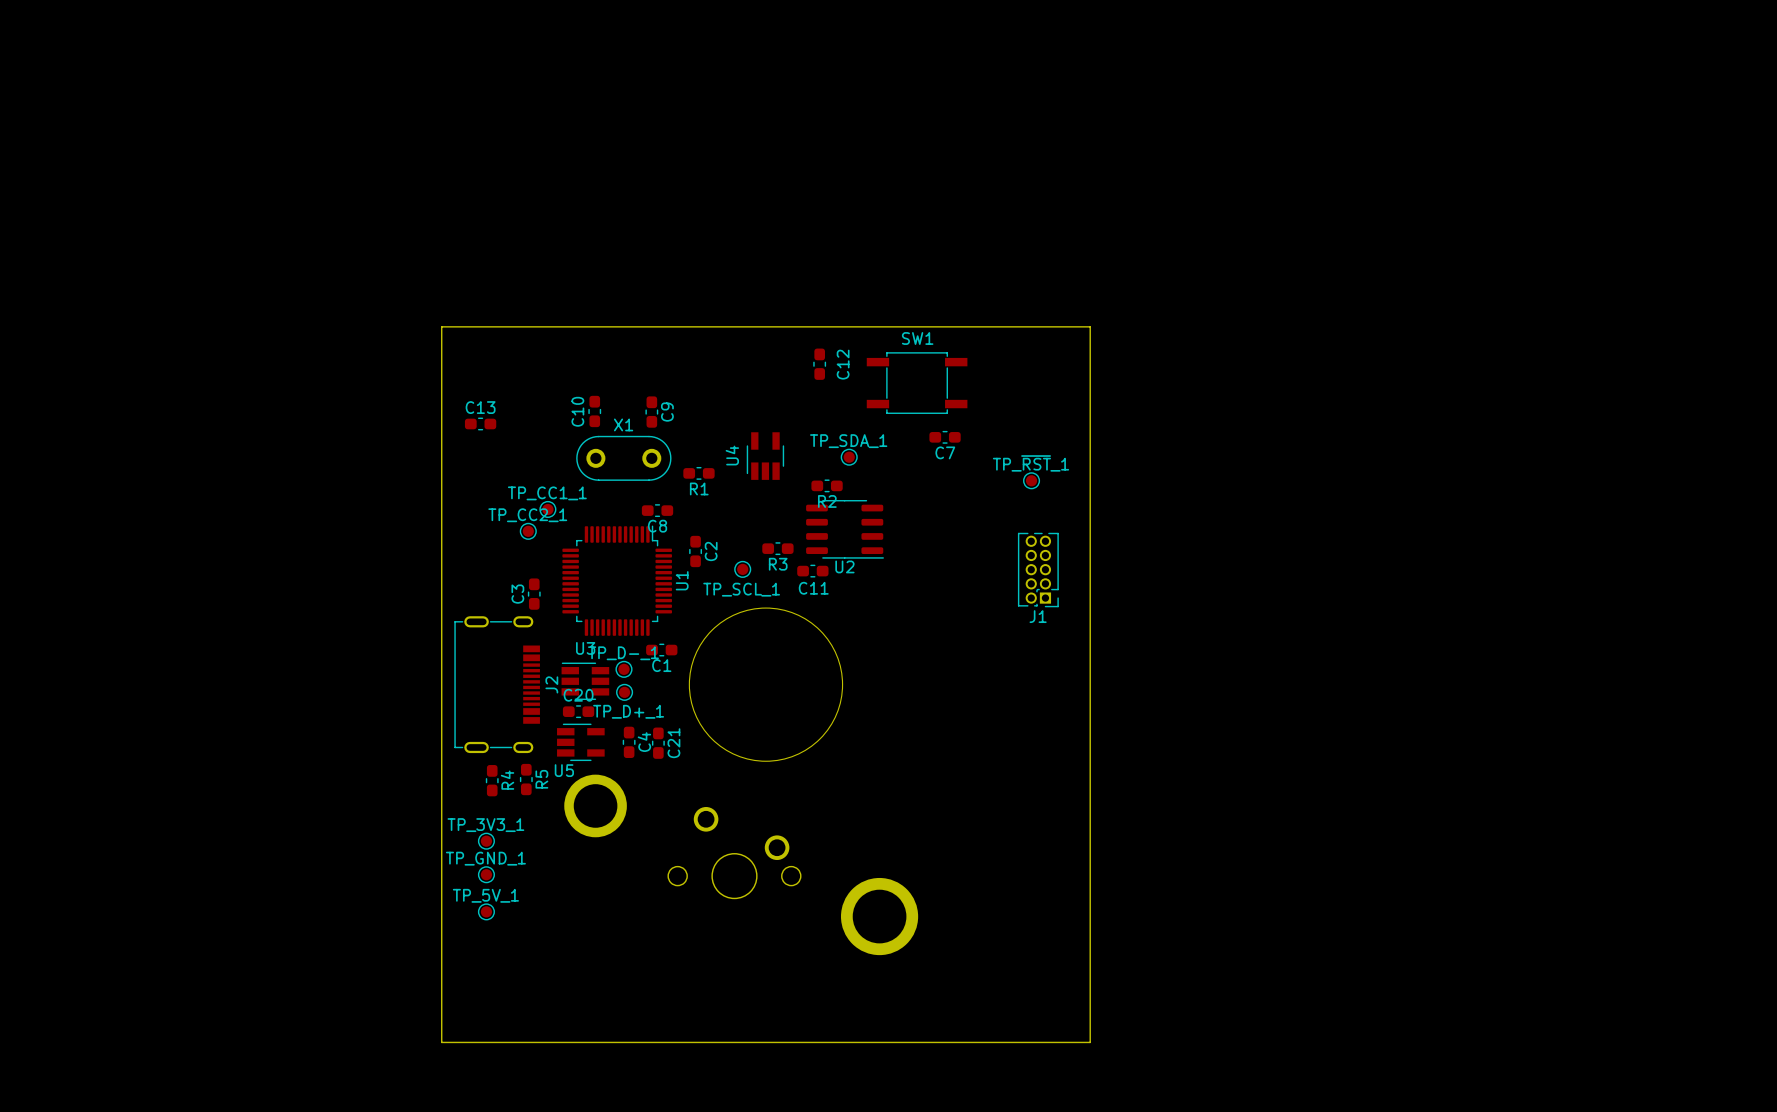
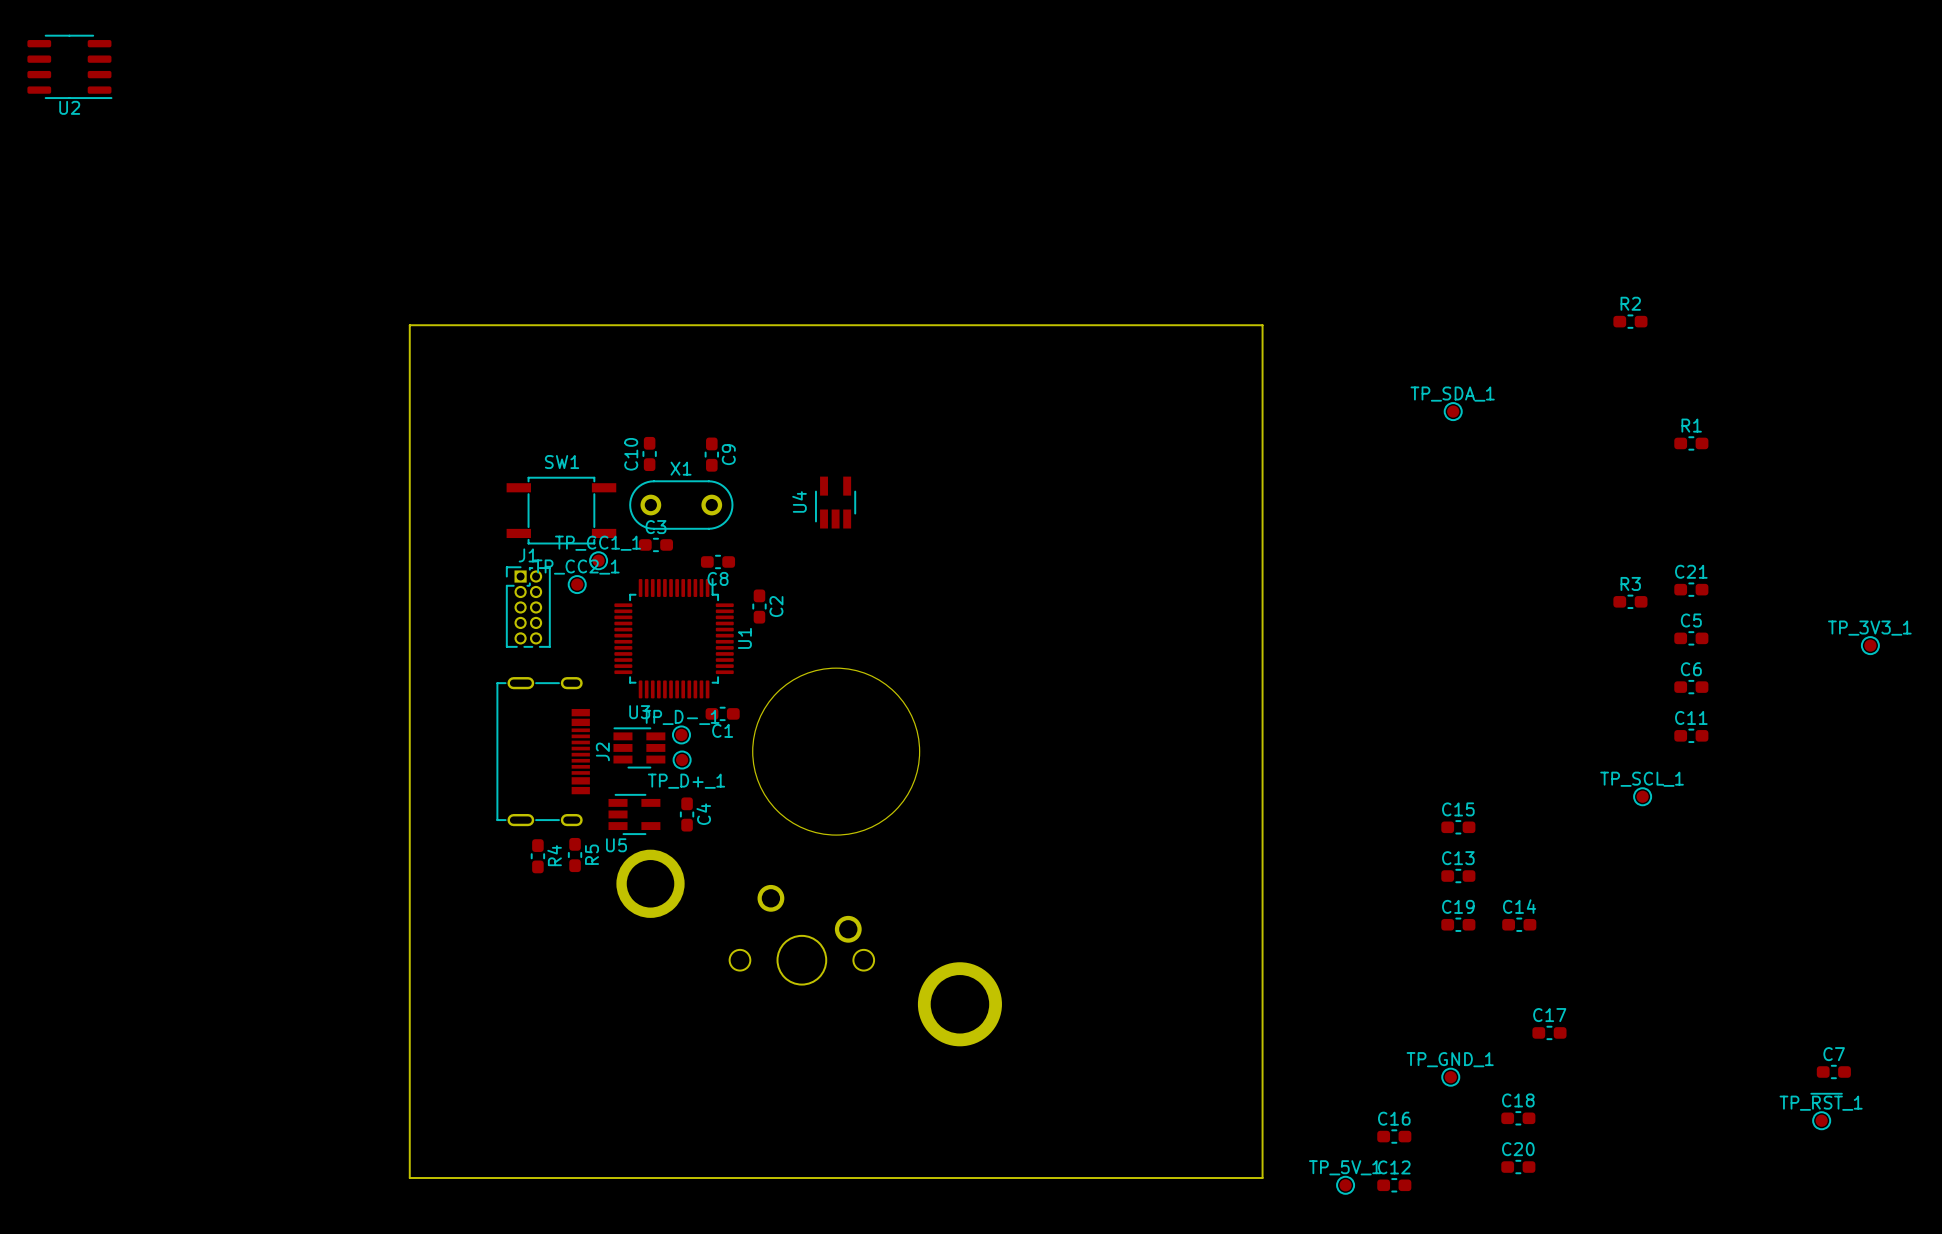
board edge: (441, 326) (1090, 326) (1090, 1042) (441, 1042) (441, 326) -> (409, 325) (409, 1178) (1262, 1178) (1262, 325) (409, 325)
C12 rotation: 0° (819, 364) -> 90° clockwise (1394, 1185)
C12 position: (819, 364) -> (1394, 1185)
C12 name position: C12 (843, 364) -> C12 (1394, 1167)
SW1 position: (917, 383) -> (561, 510)
C13 position: (480, 423) -> (1458, 876)
C7 position: (945, 437) -> (1833, 1071)
C7 name position: C7 (945, 452) -> C7 (1834, 1054)
TP_SDA_1 position: (849, 457) -> (1453, 411)
R1 position: (698, 473) -> (1691, 443)
TP_~{RST}_1 position: (1031, 480) -> (1821, 1120)
R2 position: (827, 485) -> (1630, 321)
R1 name position: R1 (699, 488) -> R1 (1691, 425)
R2 name position: R2 (827, 501) -> R2 (1630, 303)
U2 position: (845, 529) -> (69, 66)
R3 position: (777, 548) -> (1630, 601)
R3 name position: R3 (778, 564) -> R3 (1630, 583)
TP_SCL_1 position: (742, 569) -> (1642, 796)
J1 rotation: 0° (1038, 570) -> 180° (528, 607)
J1 position: (1038, 570) -> (528, 607)
C11 position: (812, 571) -> (1691, 735)
C5: none -> (1691, 638)
C11 name position: C11 (813, 588) -> C11 (1691, 717)
TP_SCL_1 name position: TP_SCL_1 (741, 589) -> TP_SCL_1 (1642, 779)
C3 rotation: 0° (534, 594) -> 90° clockwise (655, 544)
C3 position: (534, 594) -> (655, 544)
C6: none -> (1691, 687)
C20 position: (578, 711) -> (1518, 1167)
C21 rotation: 0° (658, 743) -> 90° clockwise (1691, 589)
C21 position: (658, 743) -> (1691, 589)
C21 name position: C21 (673, 743) -> C21 (1691, 571)
C15: none -> (1458, 827)
TP_3V3_1 position: (486, 841) -> (1870, 645)
C19: none -> (1458, 924)
C14: none -> (1519, 924)
TP_GND_1 position: (486, 874) -> (1450, 1077)
TP_5V_1 position: (486, 911) -> (1345, 1185)
C17: none -> (1549, 1032)
C18: none -> (1518, 1118)
C16: none -> (1394, 1136)

